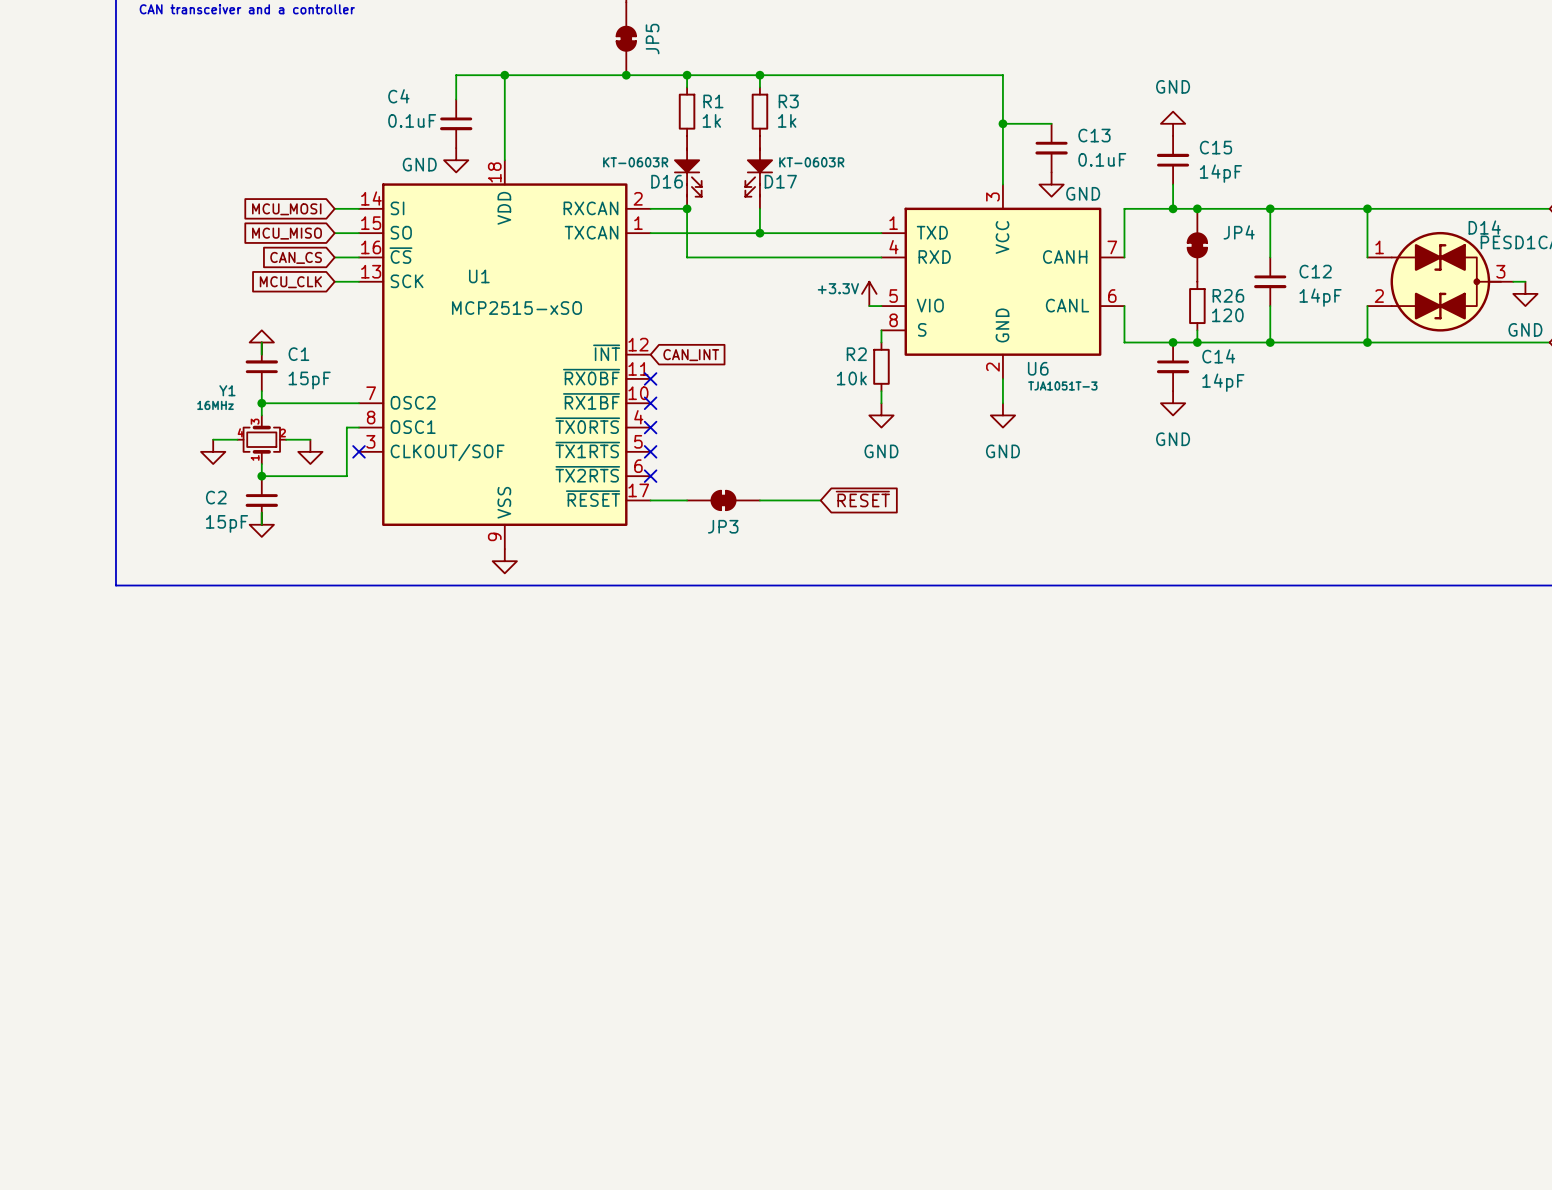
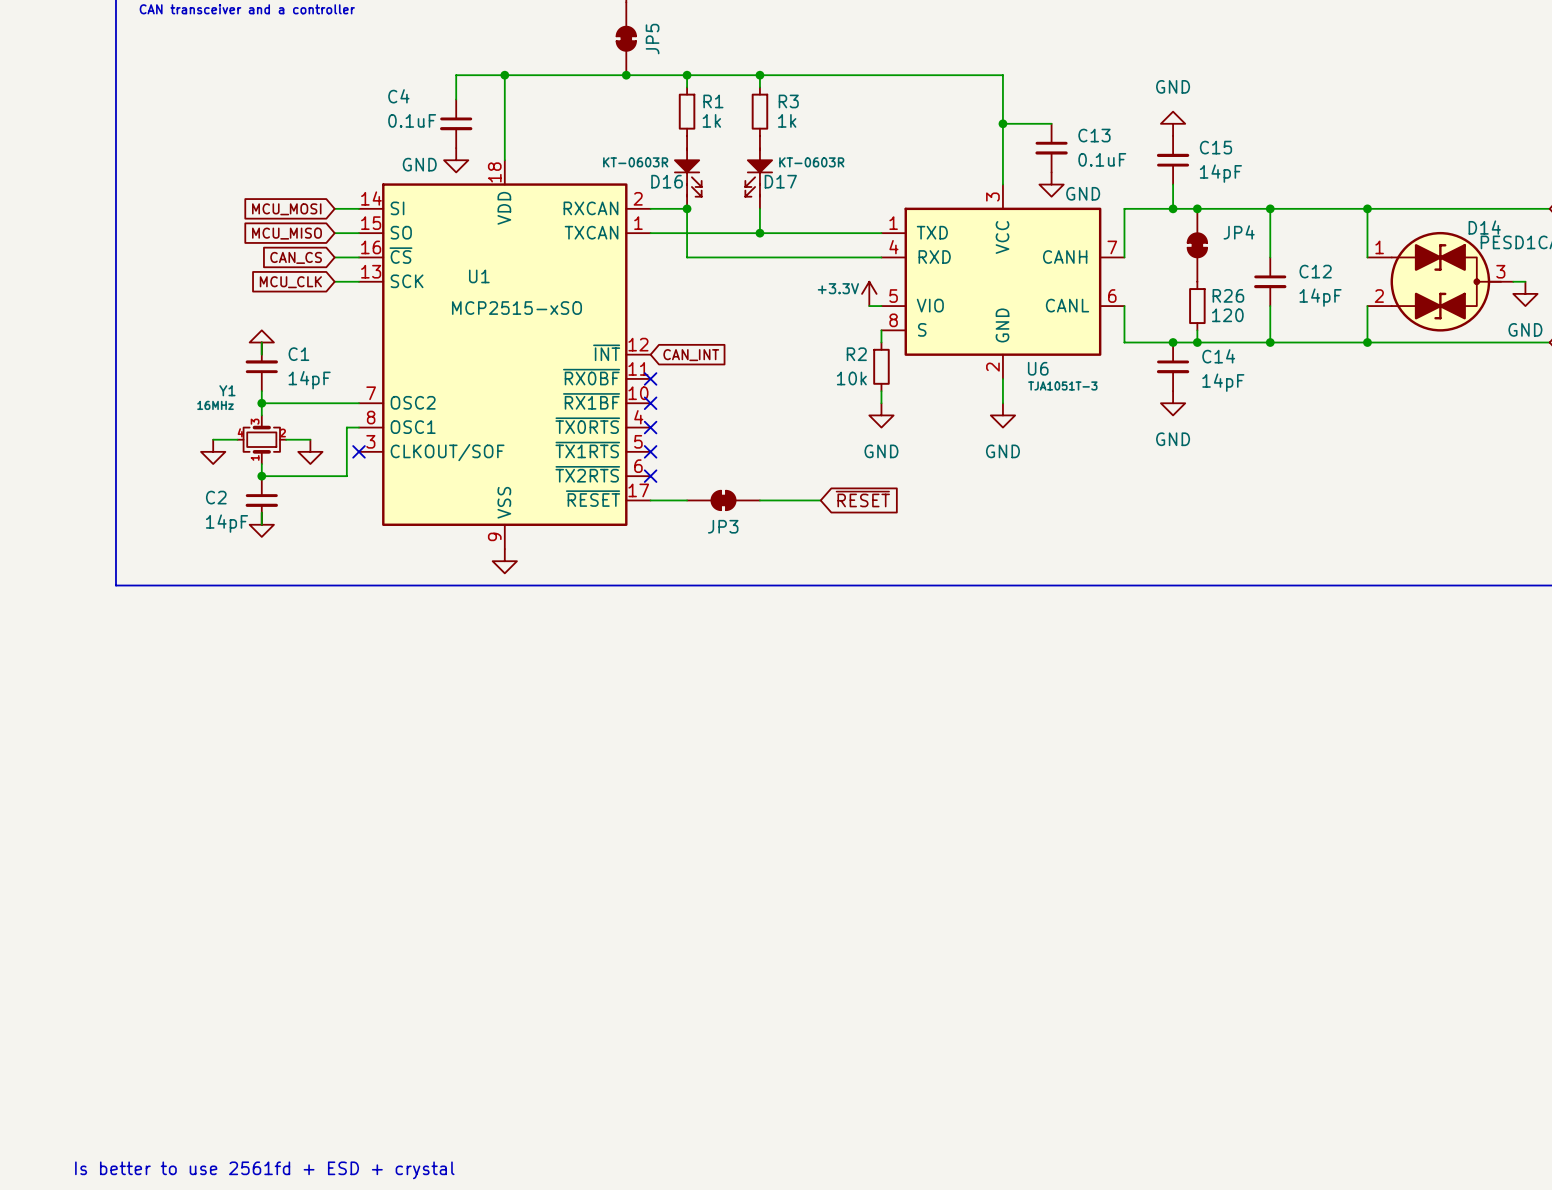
C1 value: 15pF (309, 380) -> 14pF (309, 380)
C2 value: 15pF (227, 523) -> 14pF (227, 523)
text: none -> Is better to use 2561fd + ESD + crystal (264, 1170)

